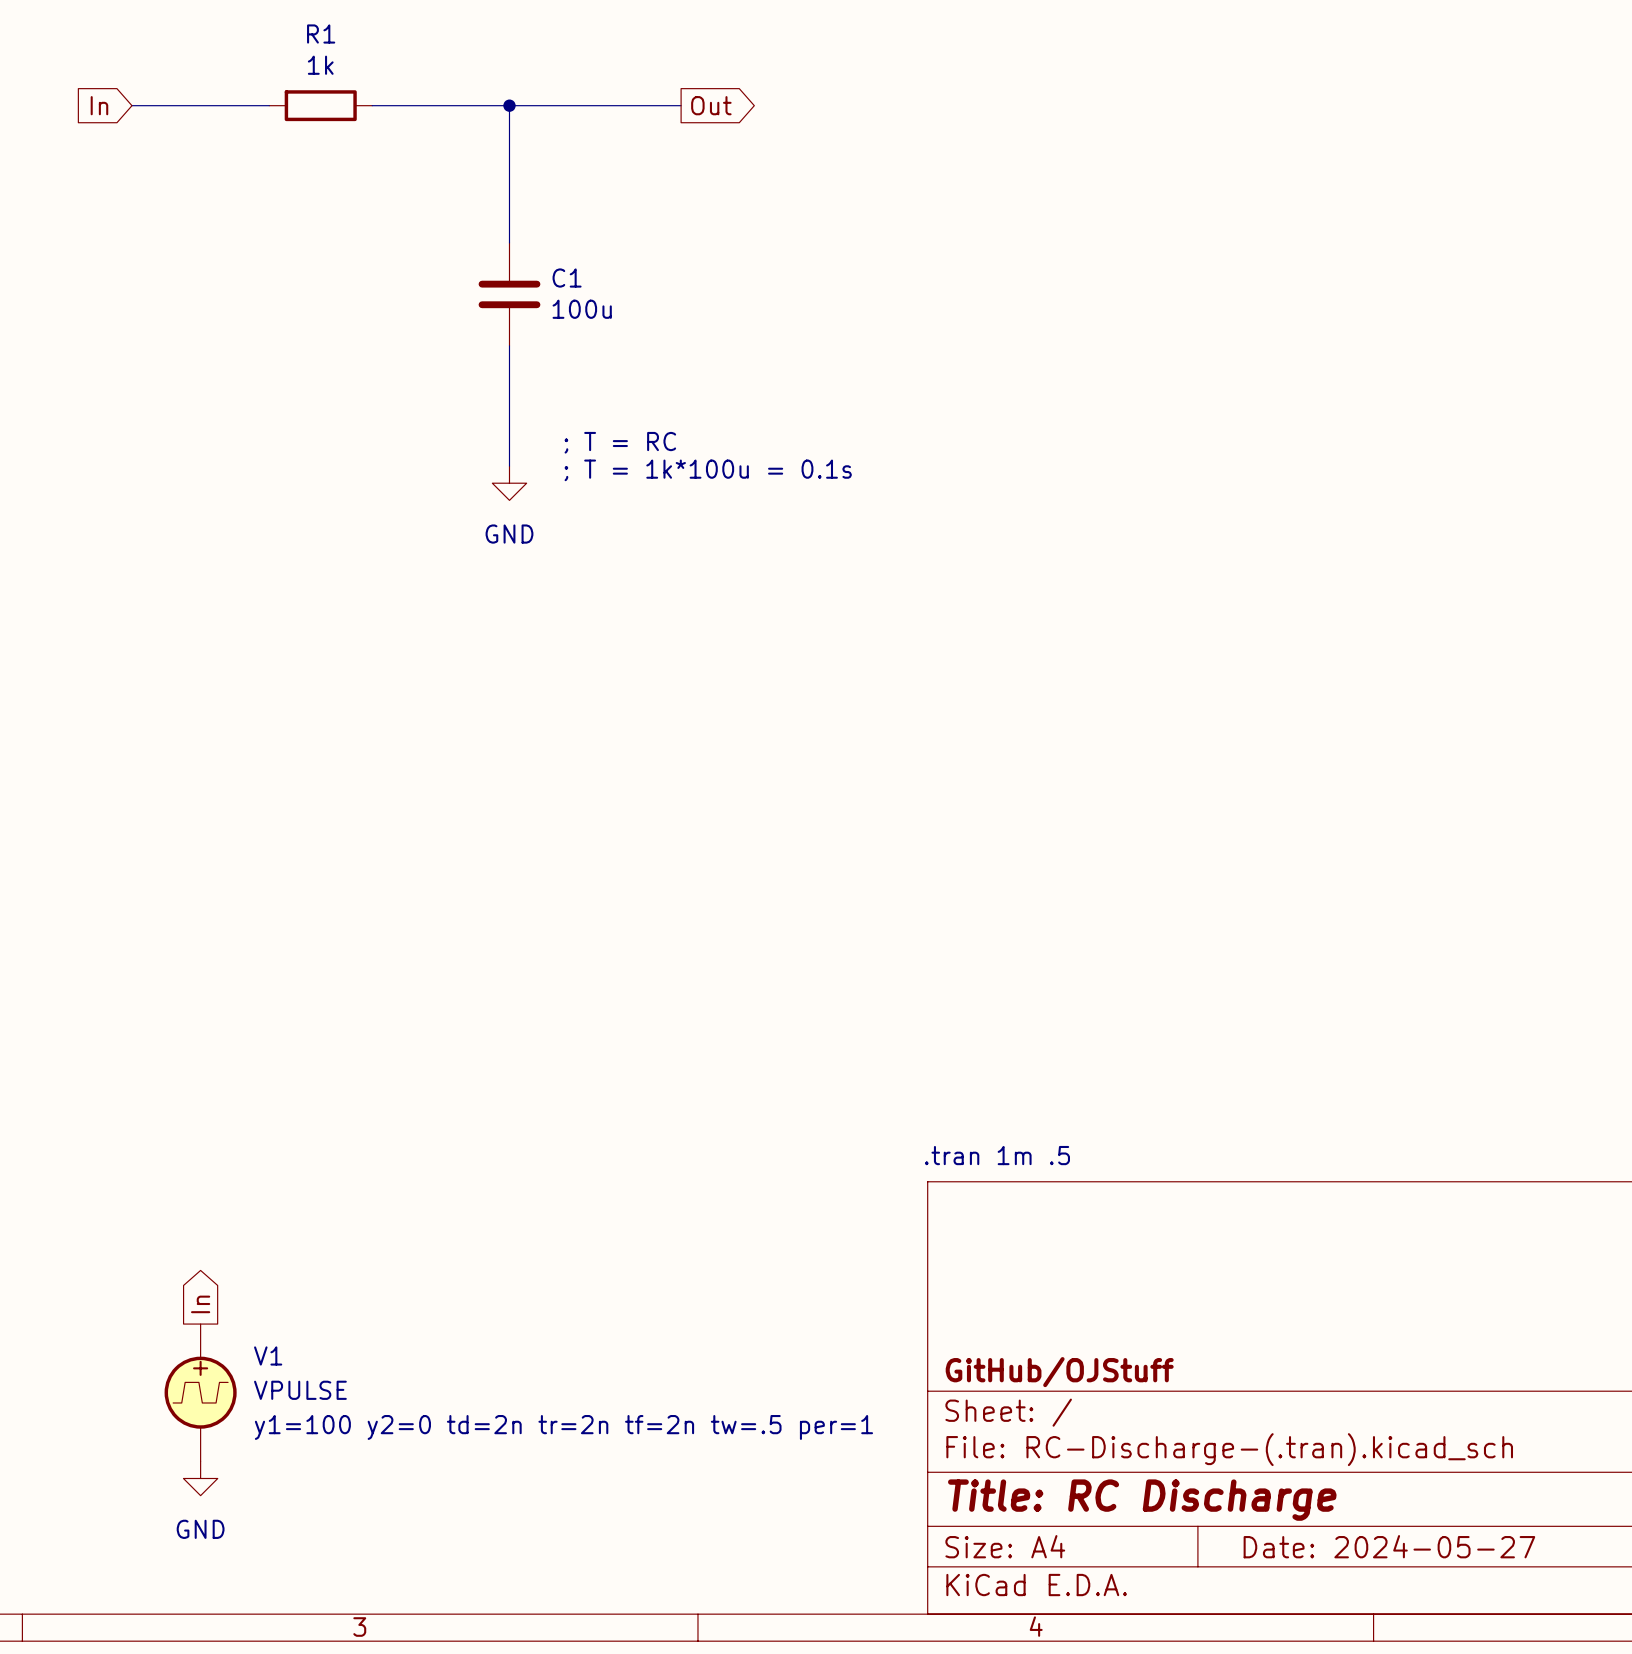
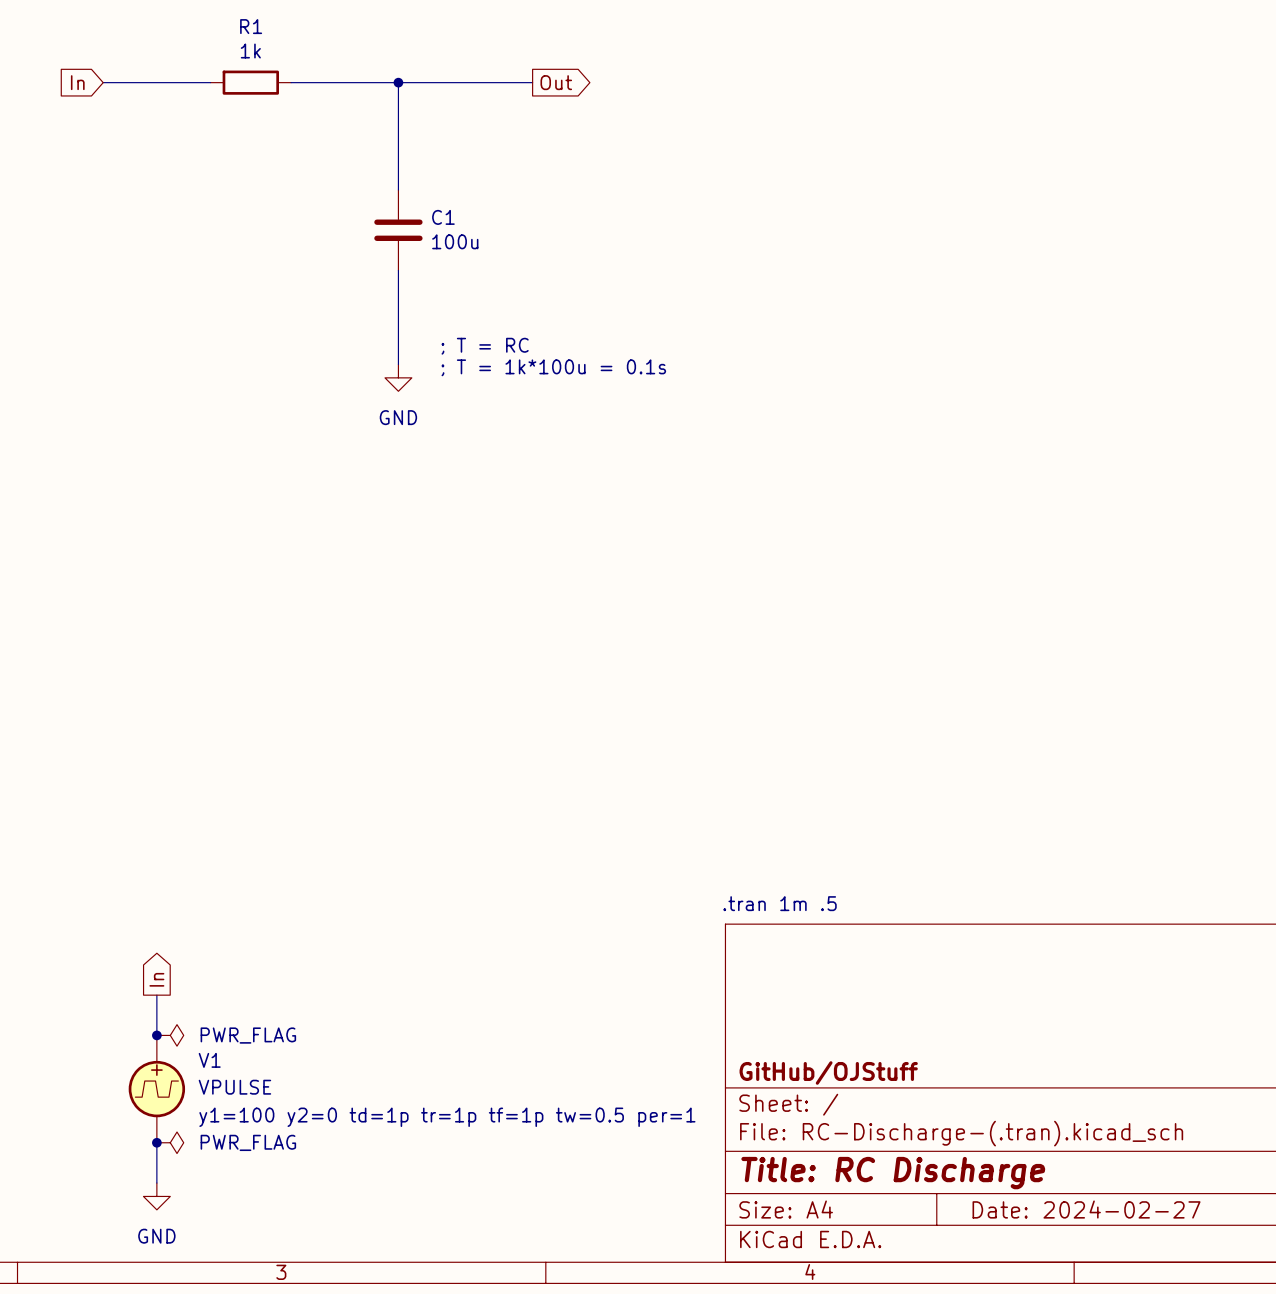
wire: none -> (156, 995) (156, 1035)
global label position: In (200, 1304) -> In (156, 979)
junction: none -> (156, 1035)
power symbol: none -> PWR_FLAG (170, 1035)
V1 text: y1=100 y2=0 td=2n tr=2n tf=2n tw=.5 per=1 (563, 1427) -> y1=100 y2=0 td=1p tr=1p tf=1p tw=0.5 per=1 (447, 1117)
wire: none -> (156, 1142) (156, 1183)
junction: none -> (156, 1142)
power symbol: none -> PWR_FLAG (170, 1142)
power symbol position: GND (200, 1478) -> GND (156, 1196)
title block: Date: 2024-05-27 (1389, 1546) -> Date: 2024-02-27 (1086, 1209)

